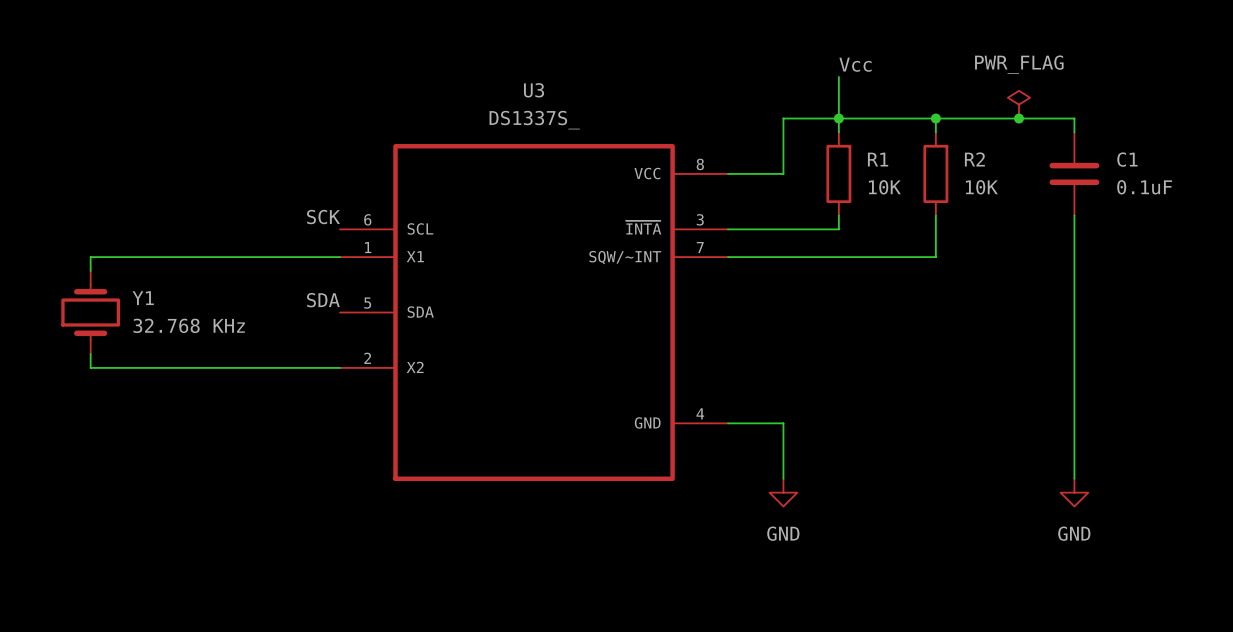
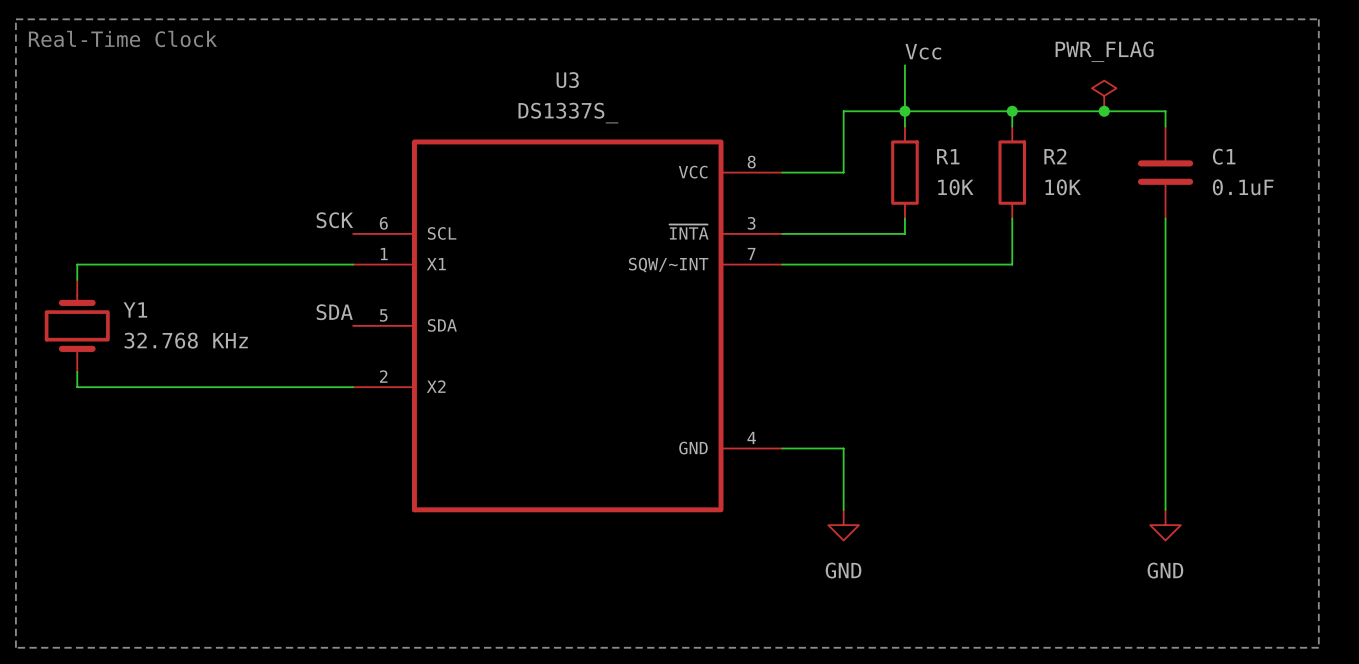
line: none -> (15, 19) (1318, 19) (1318, 647) (15, 647) (15, 19)
text: none -> Real-Time Clock (122, 38)

